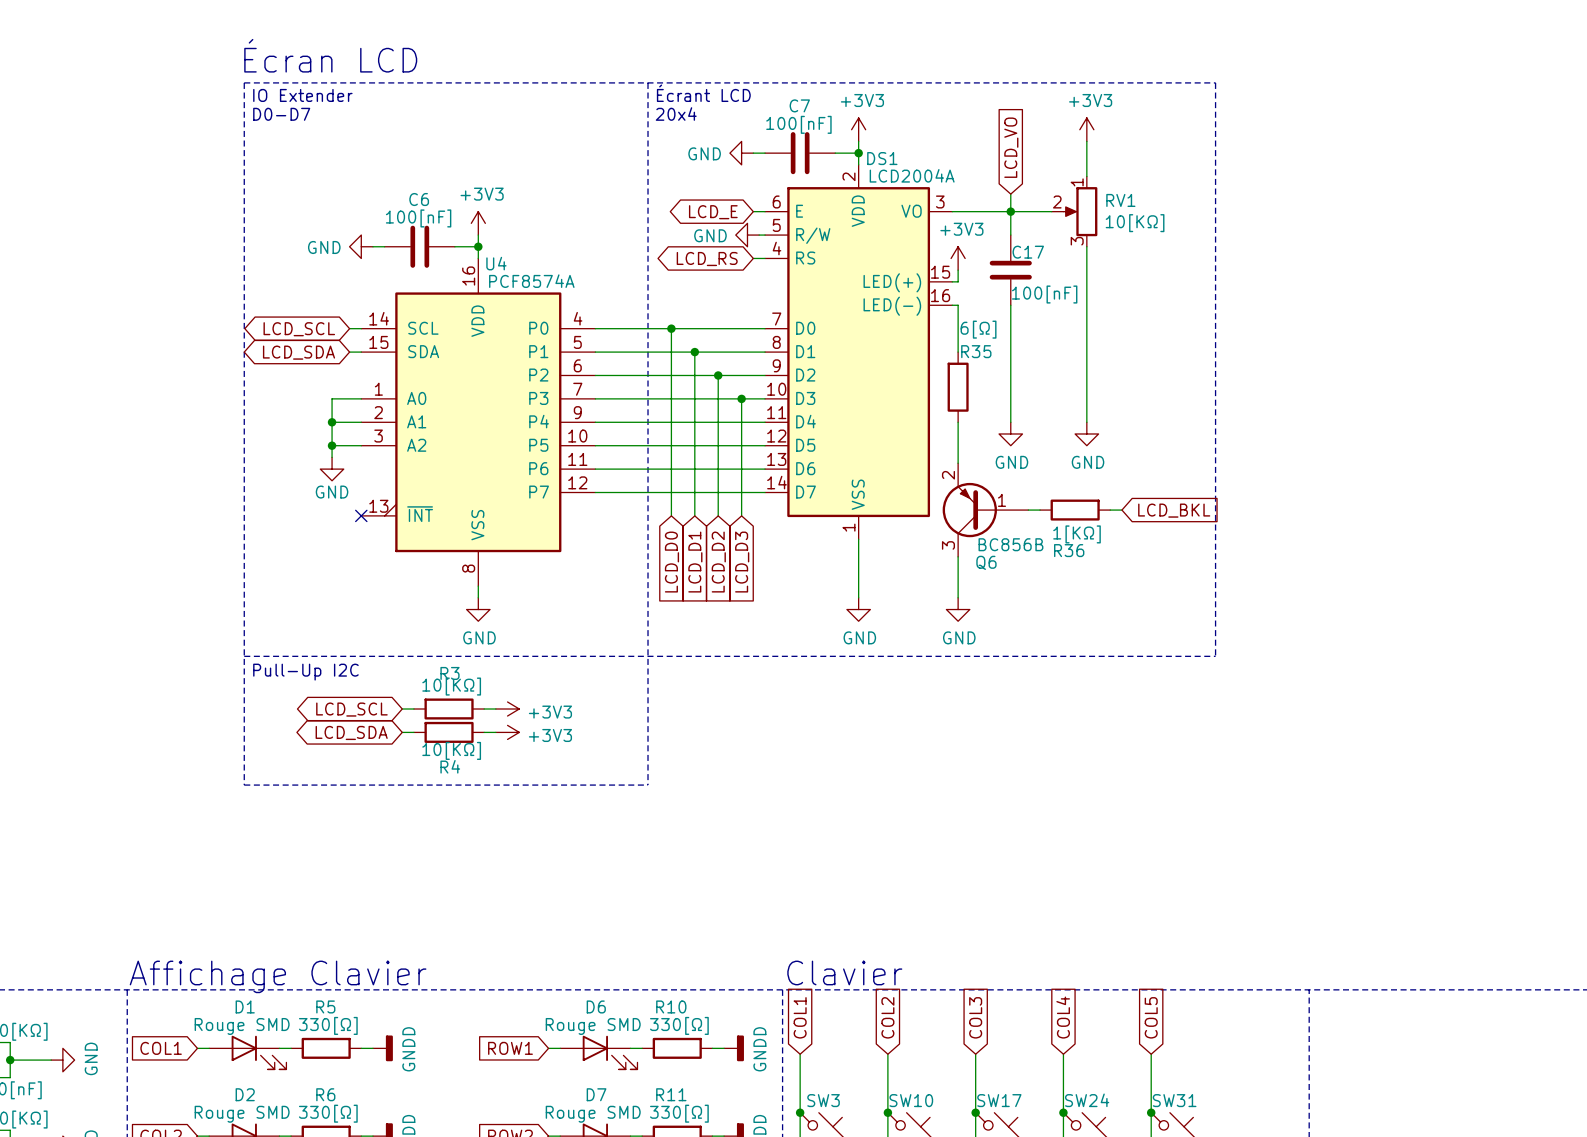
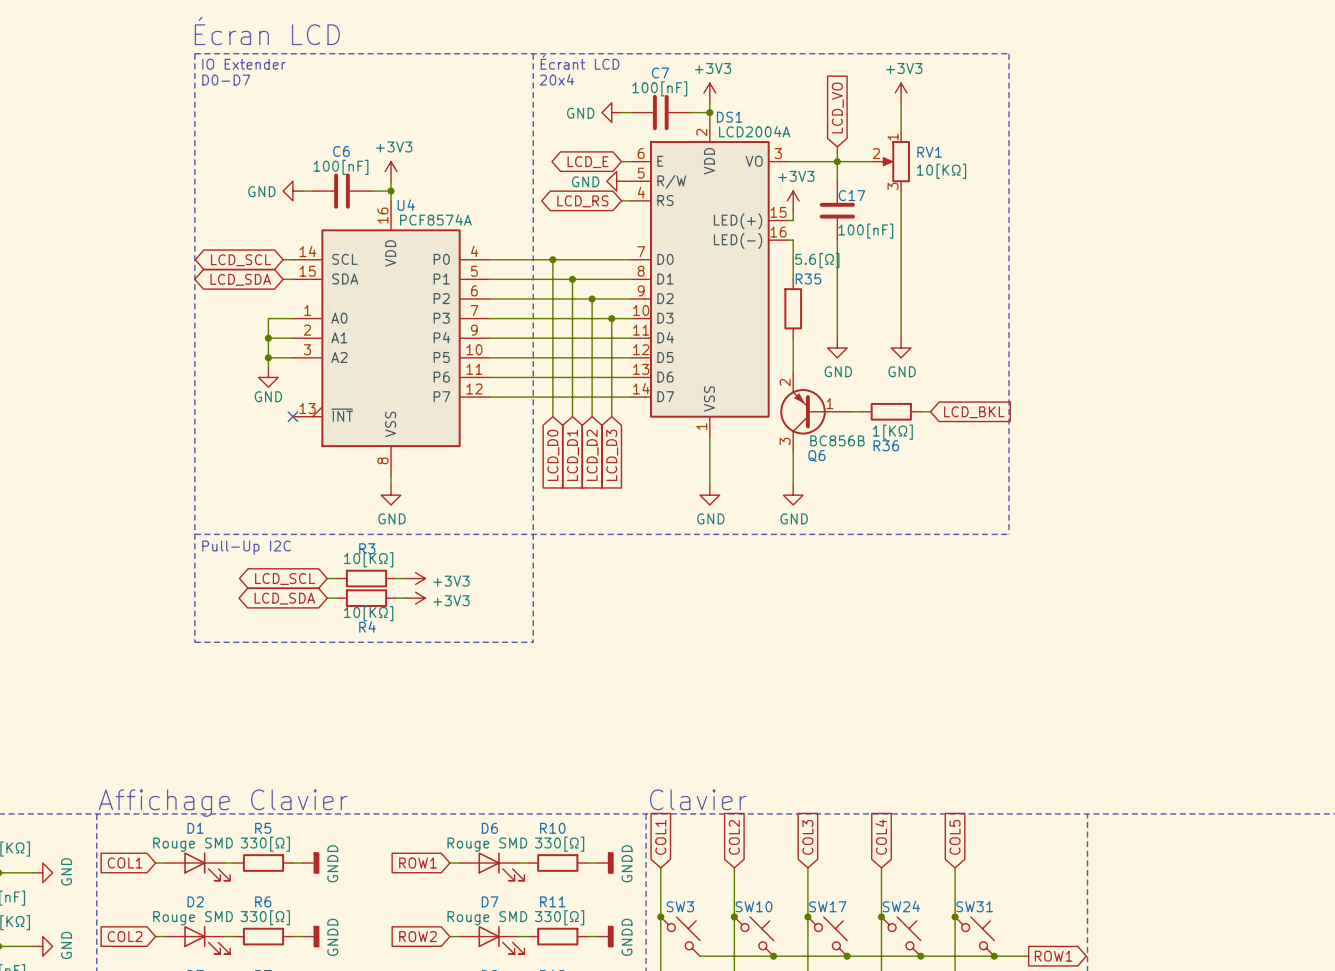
R35 value: 6[Ω] (978, 329) -> 5.6[Ω] (817, 260)

